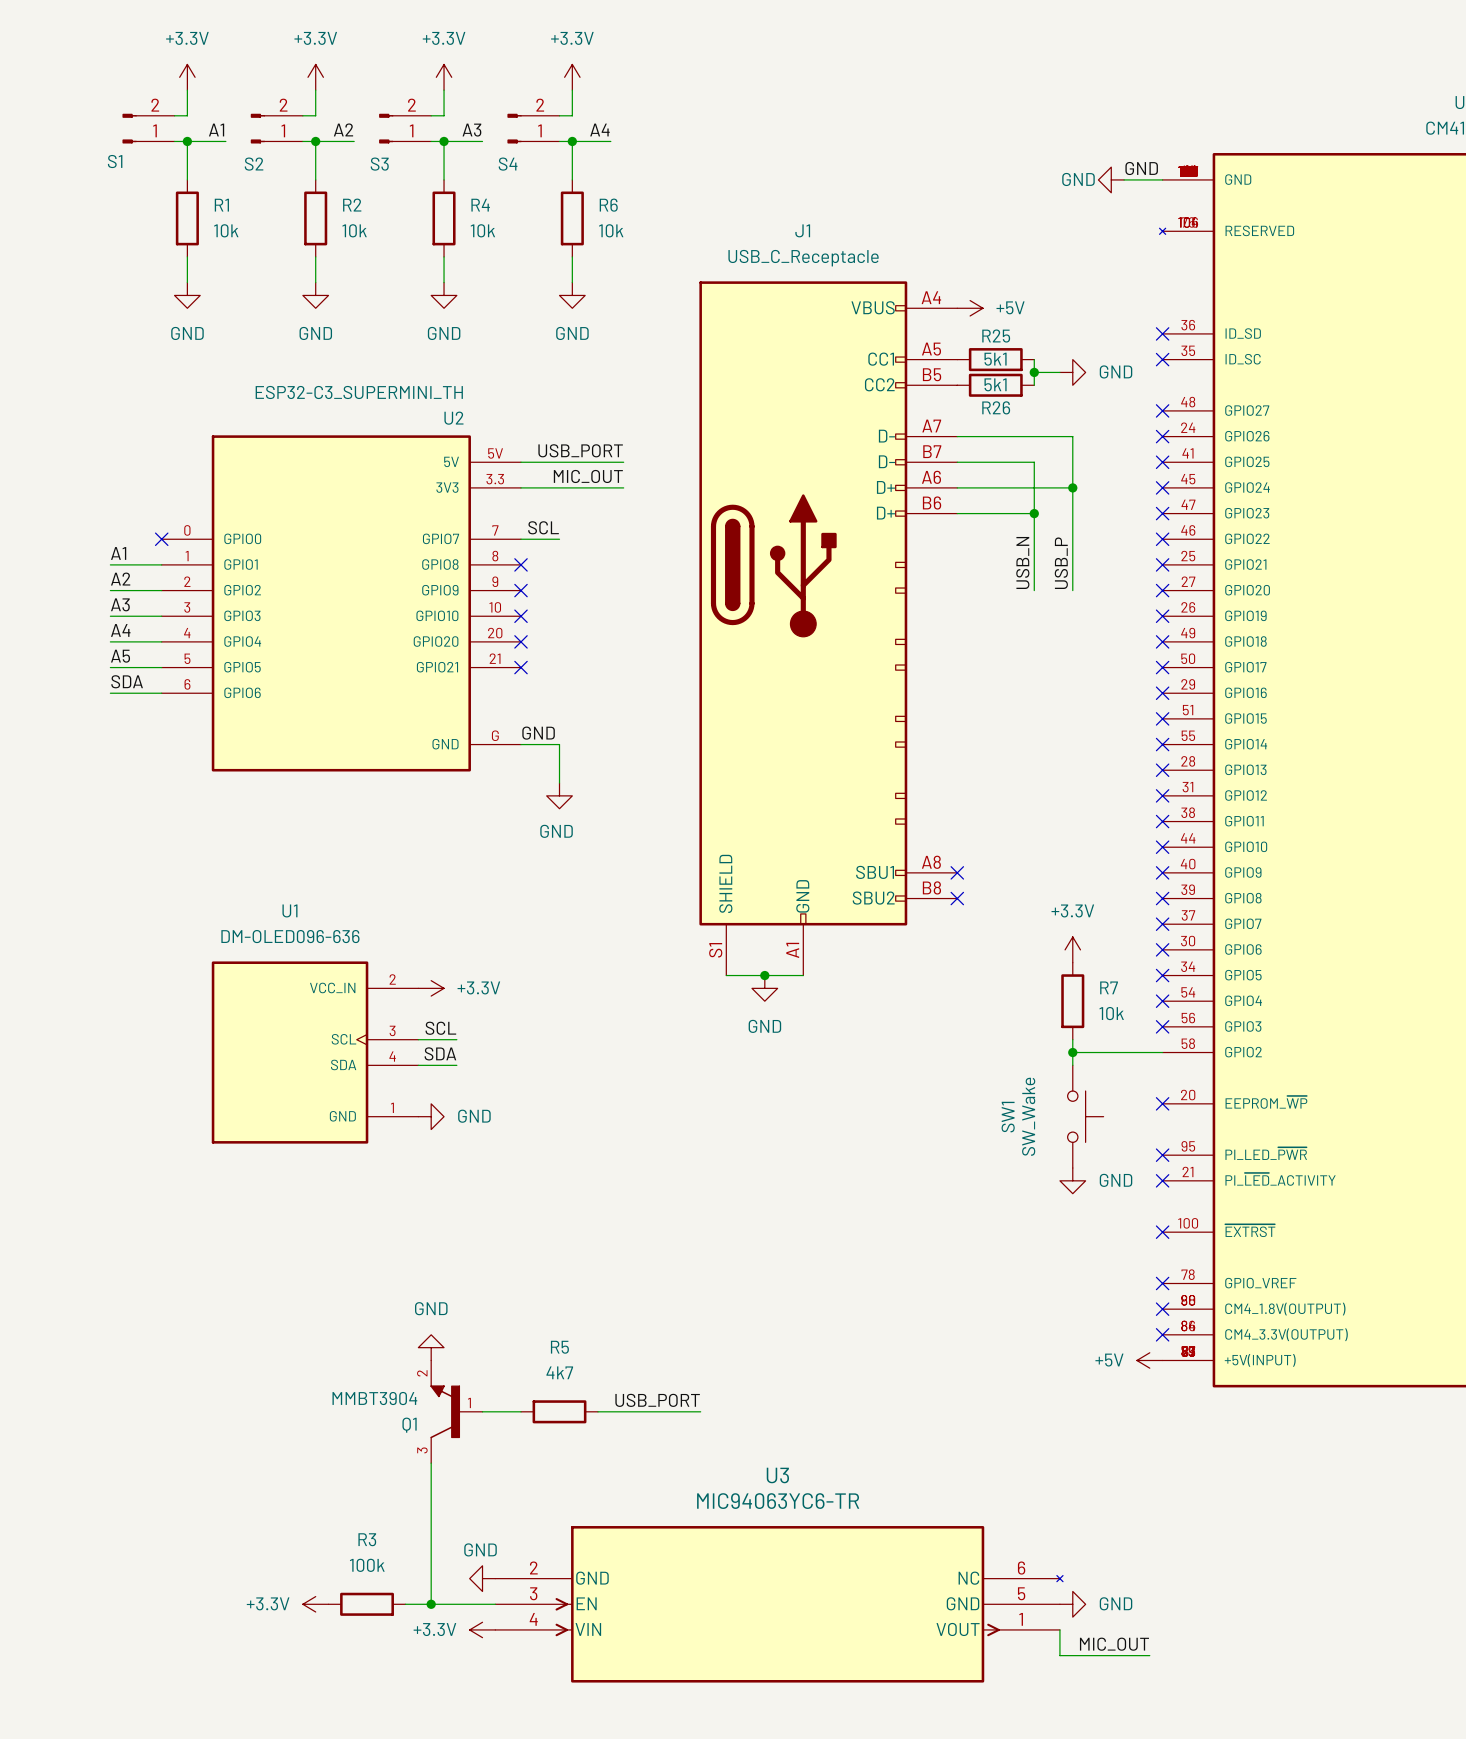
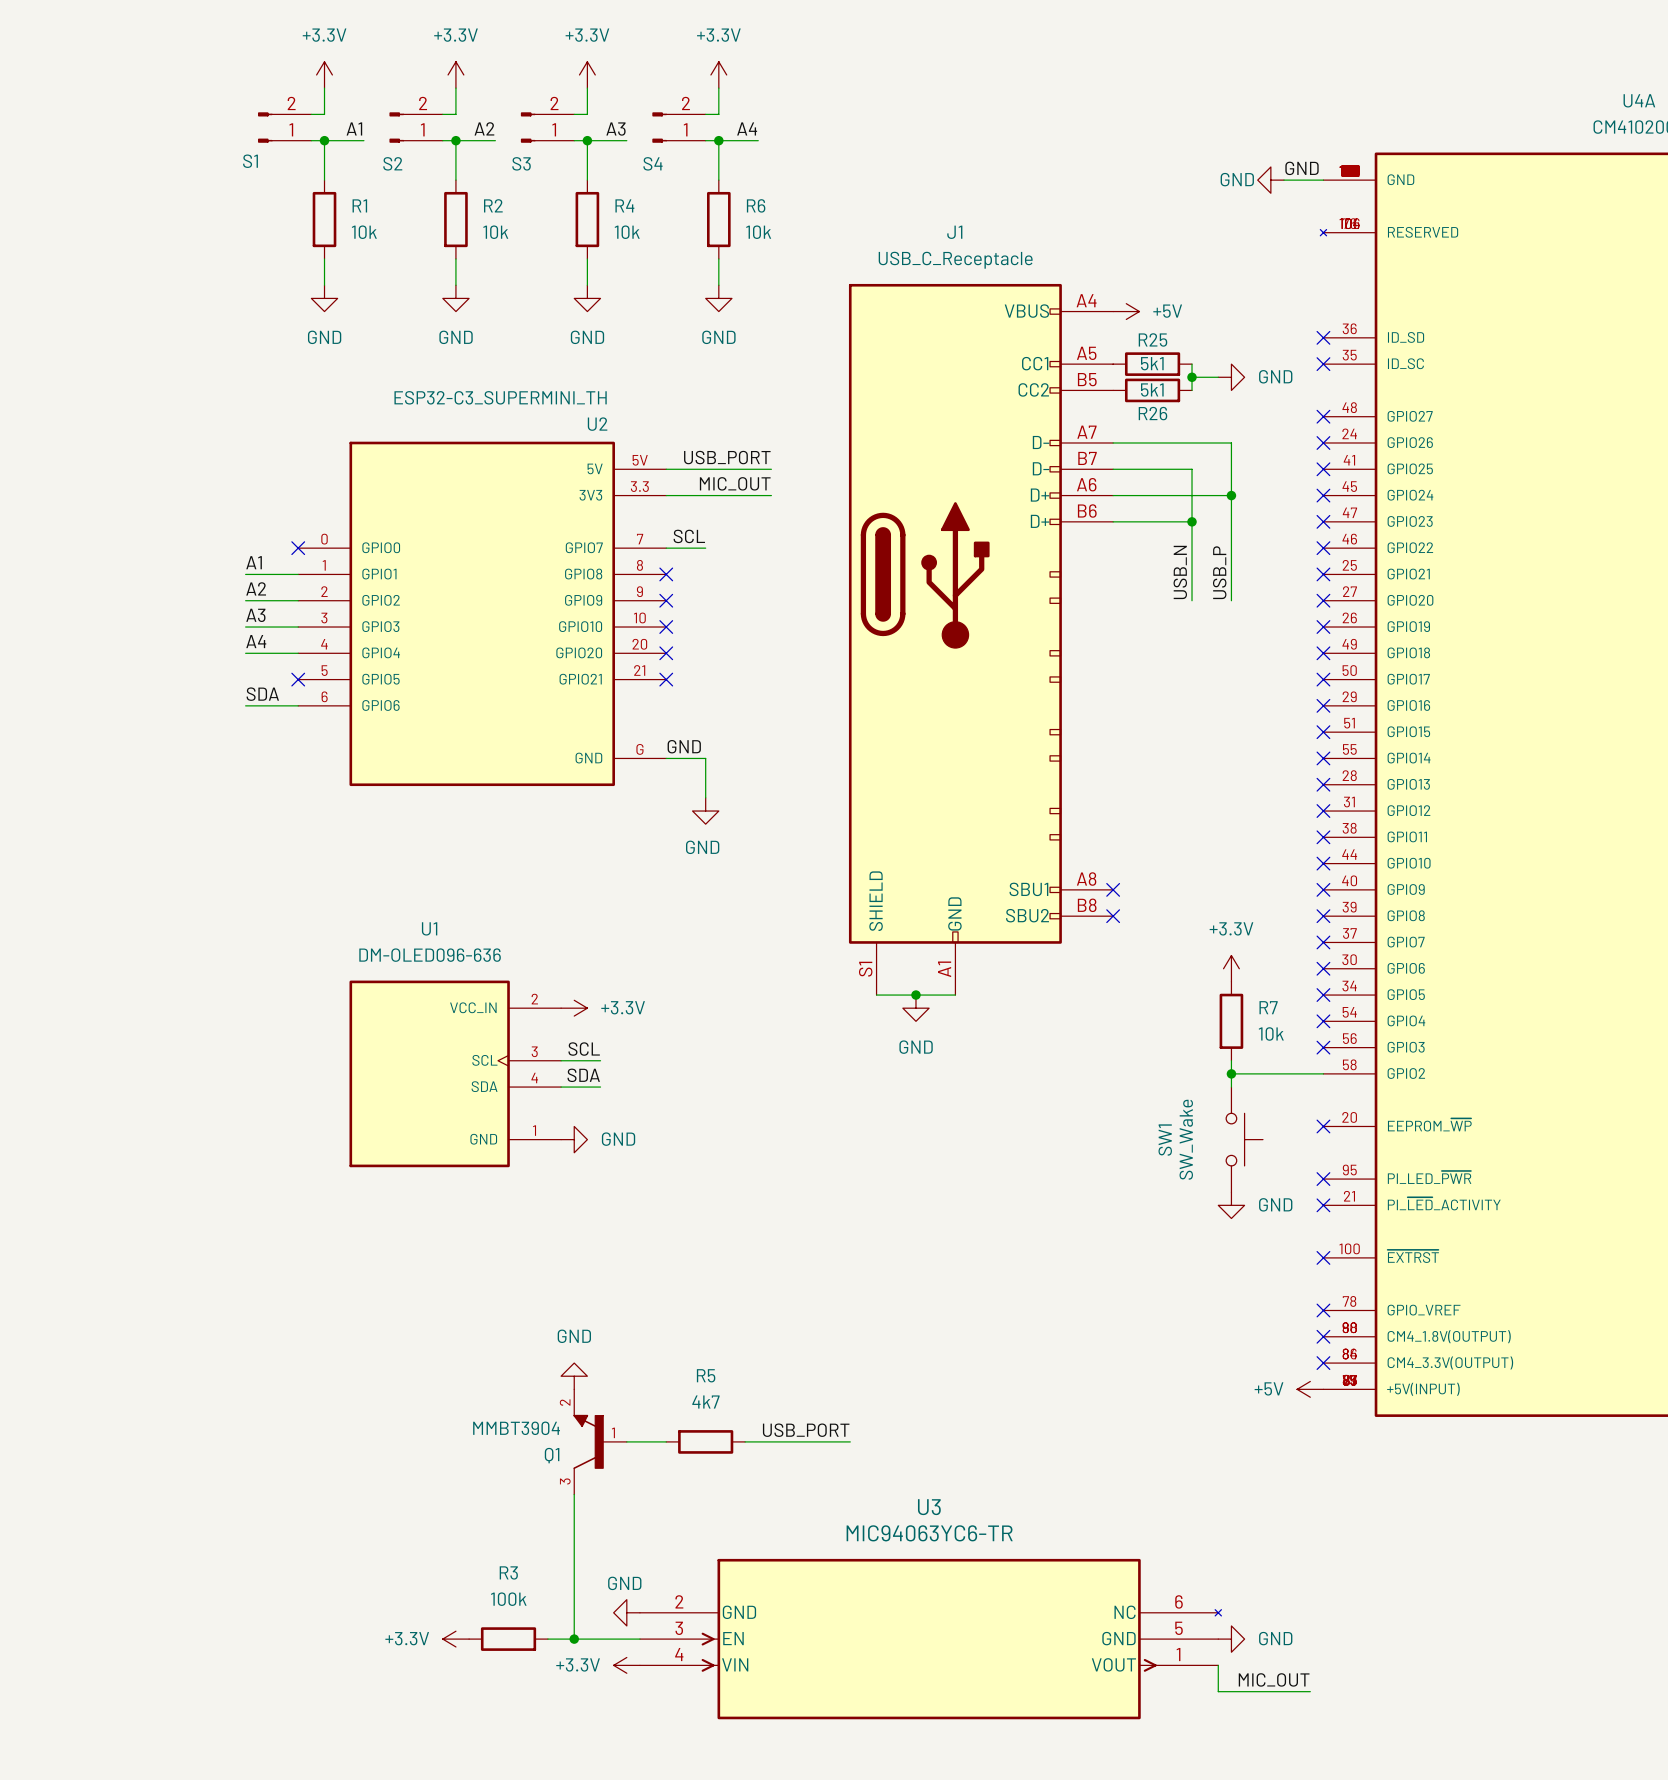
label: A5 (120, 656) -> none
wire: (110, 667) (161, 667) -> none
no-connect mark: none -> (298, 679)

